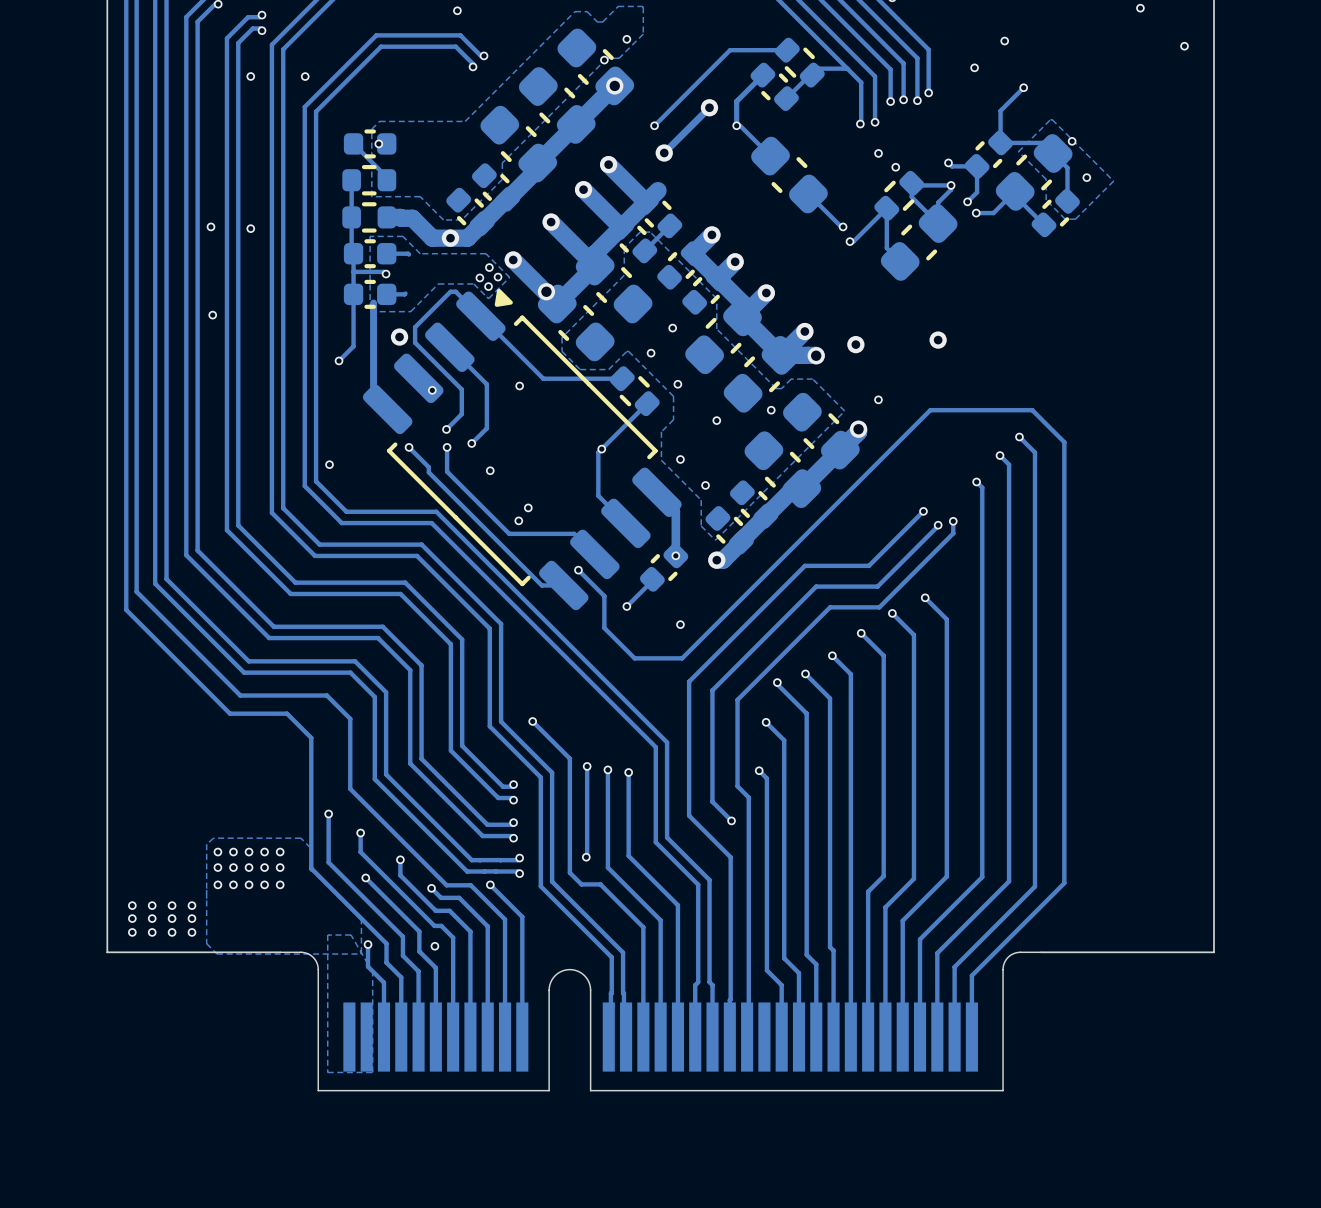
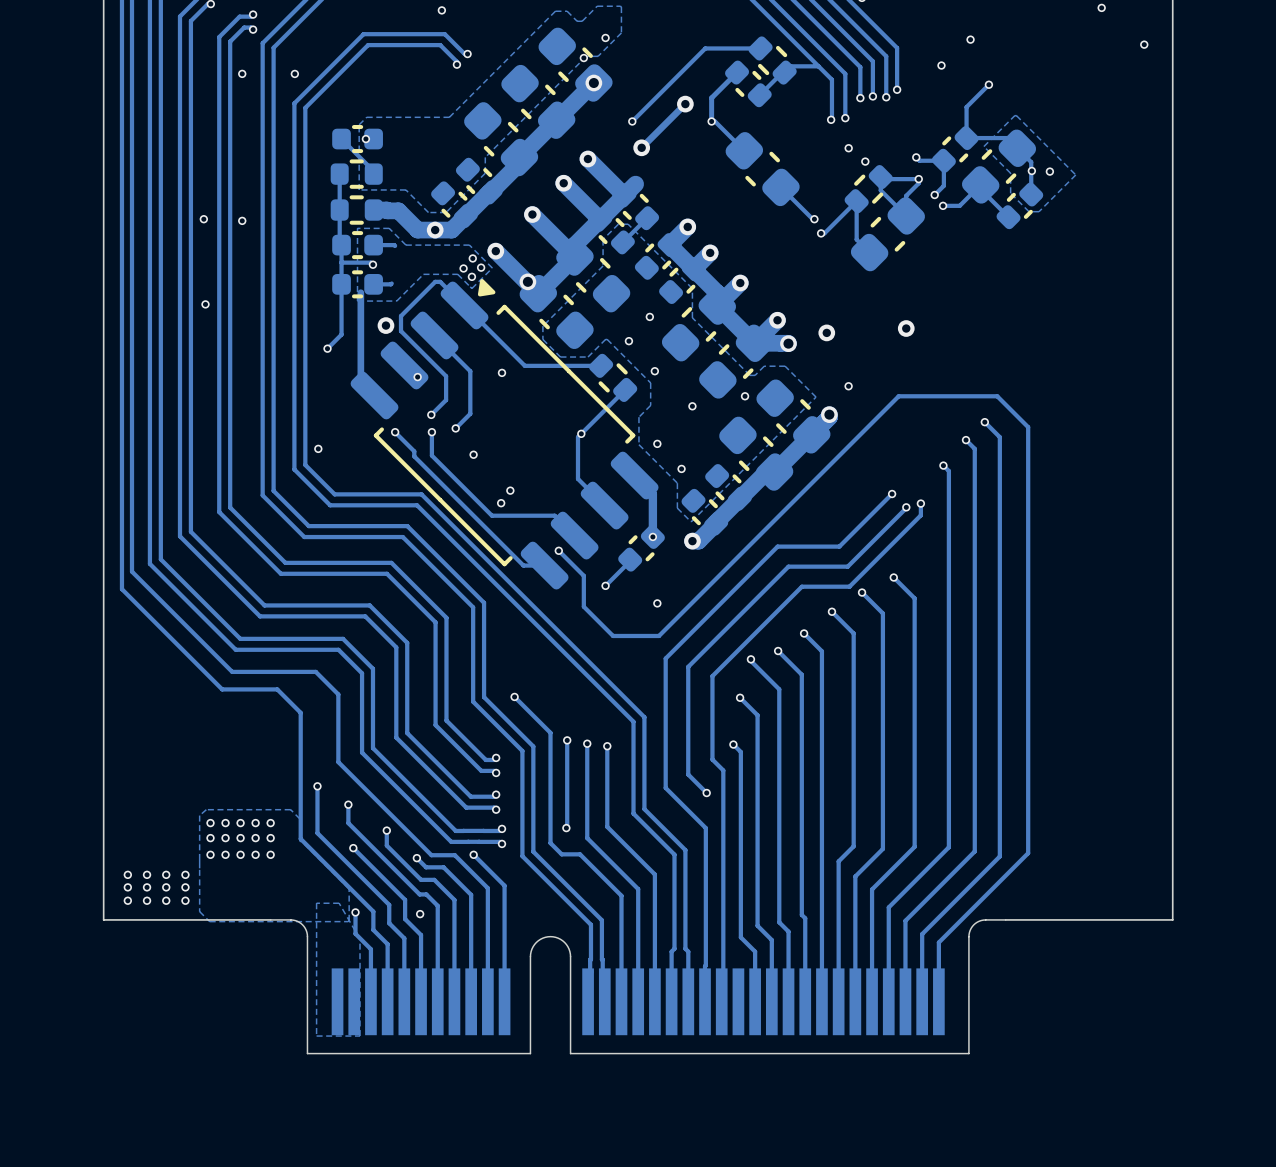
via position: (1072, 141) -> (1031, 170)

